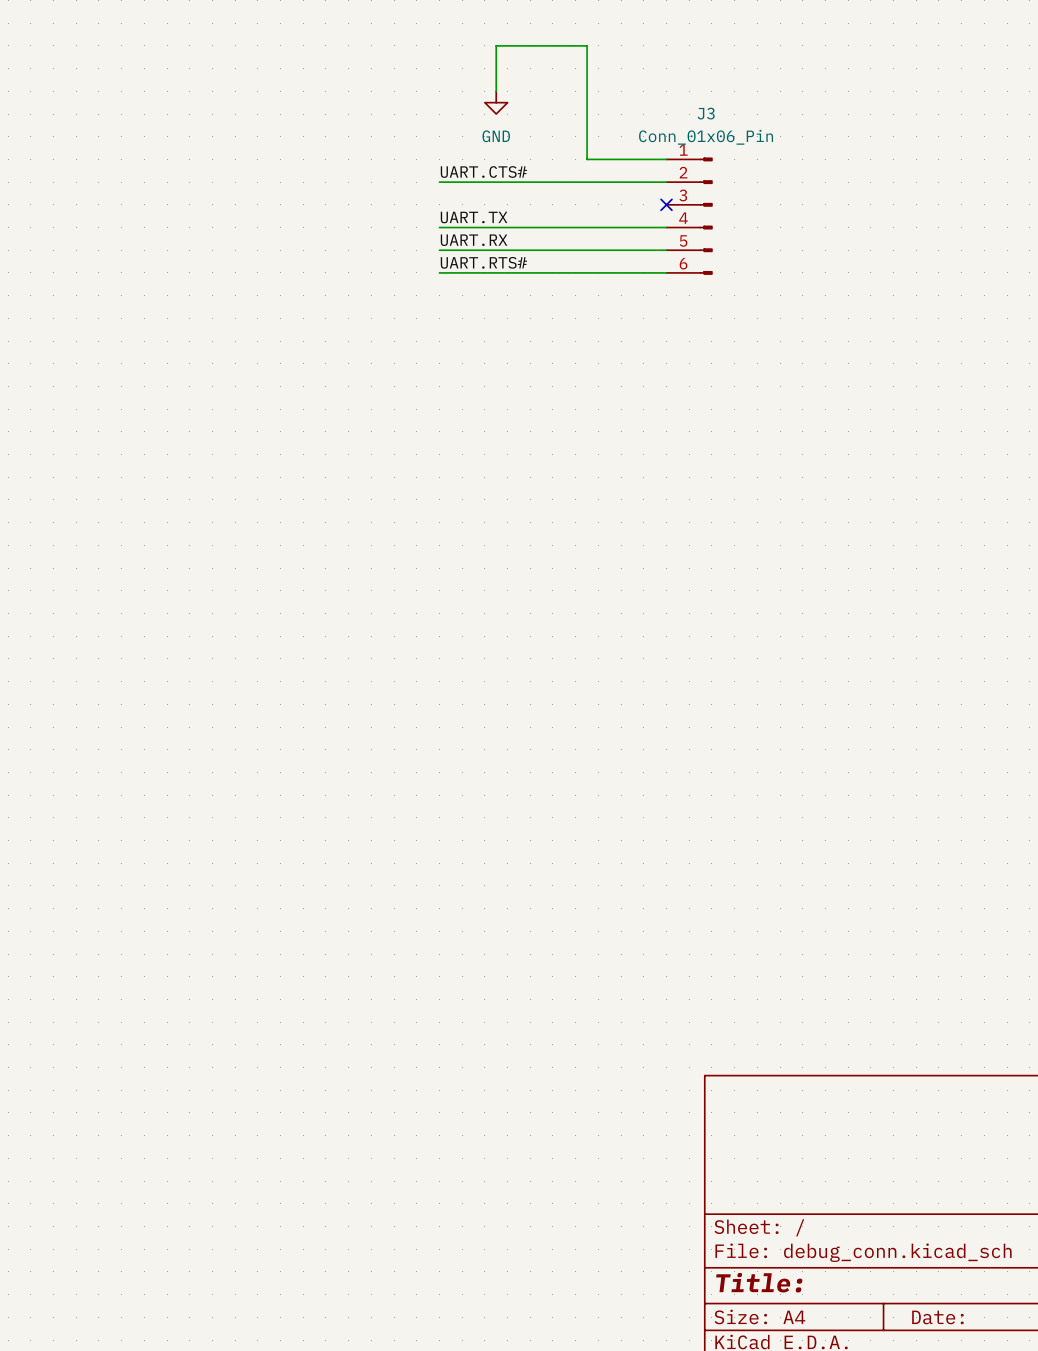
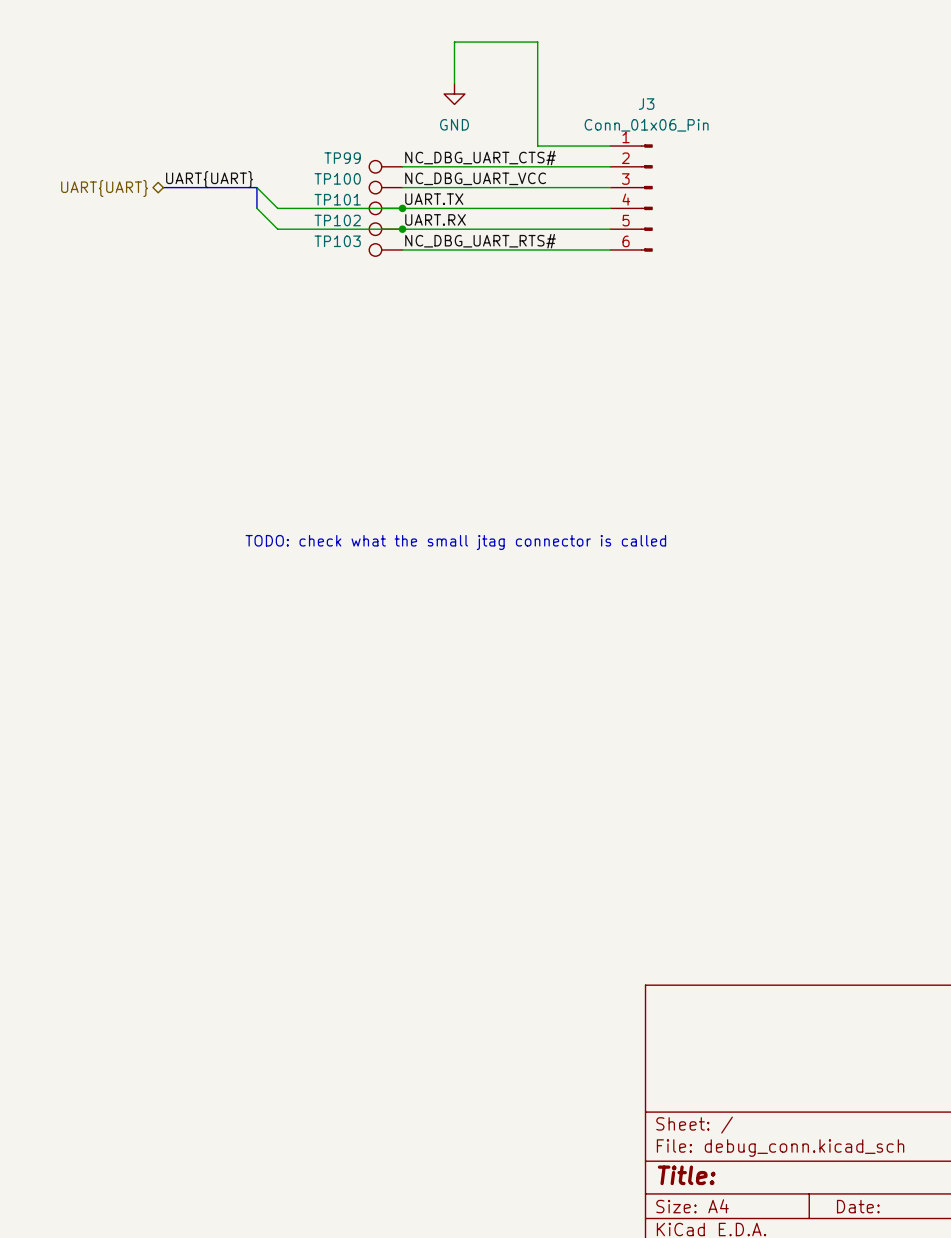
label: UART.CTS# (483, 171) -> NC_DBG_UART_CTS# (480, 158)
TP99: none -> (385, 166)
label: none -> UART{UART} (209, 179)
label: none -> NC_DBG_UART_VCC (475, 178)
bus: none -> (163, 187) (256, 187) (256, 208)
wire: none -> (256, 187) (277, 208) (402, 208)
TP100: none -> (385, 187)
wire: none -> (402, 187) (610, 187)
no-connect mark: (666, 204) -> none
hierarchical label: none -> UART{UART} (104, 188)
wire: none -> (256, 208) (277, 229) (402, 229)
TP101: none -> (385, 208)
junction: none -> (402, 208)
TP102: none -> (385, 229)
junction: none -> (402, 229)
label: UART.RTS# (483, 262) -> NC_DBG_UART_RTS# (480, 241)
TP103: none -> (385, 249)
text: none -> TODO: check what the small jtag connector is called (455, 542)

